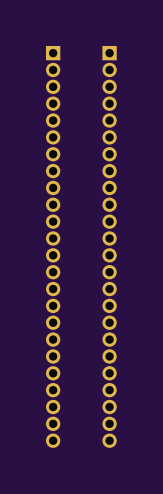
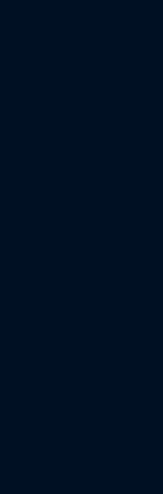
part: (53, 246) -> none
part: (109, 246) -> none

